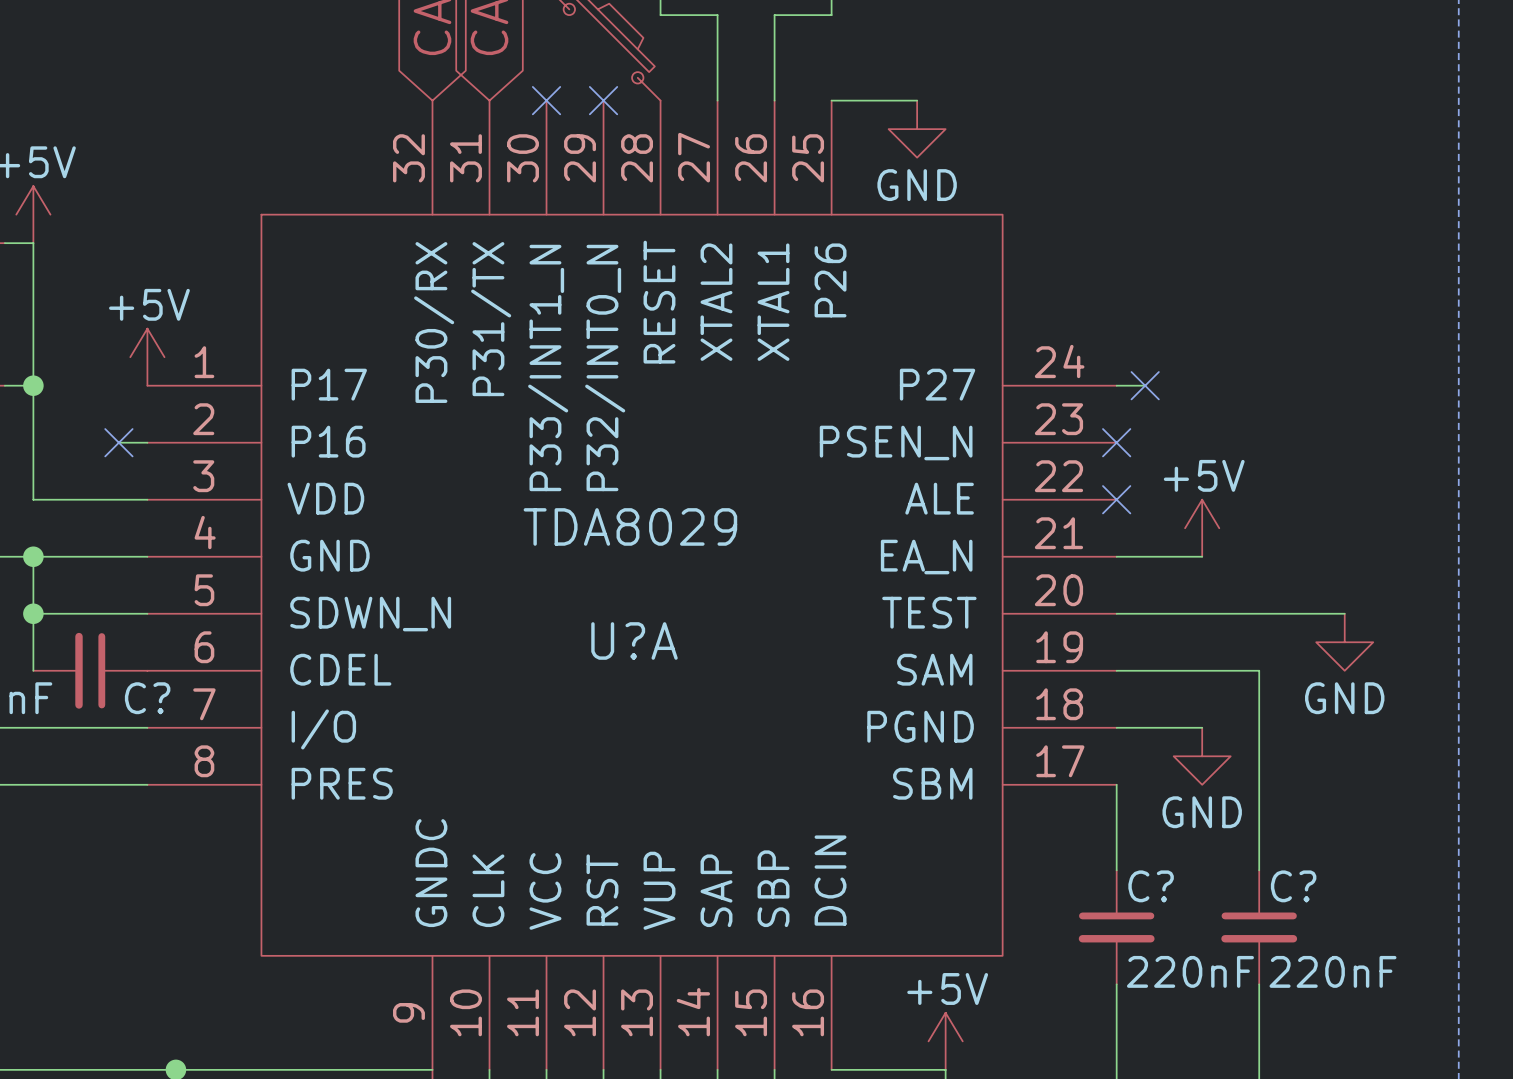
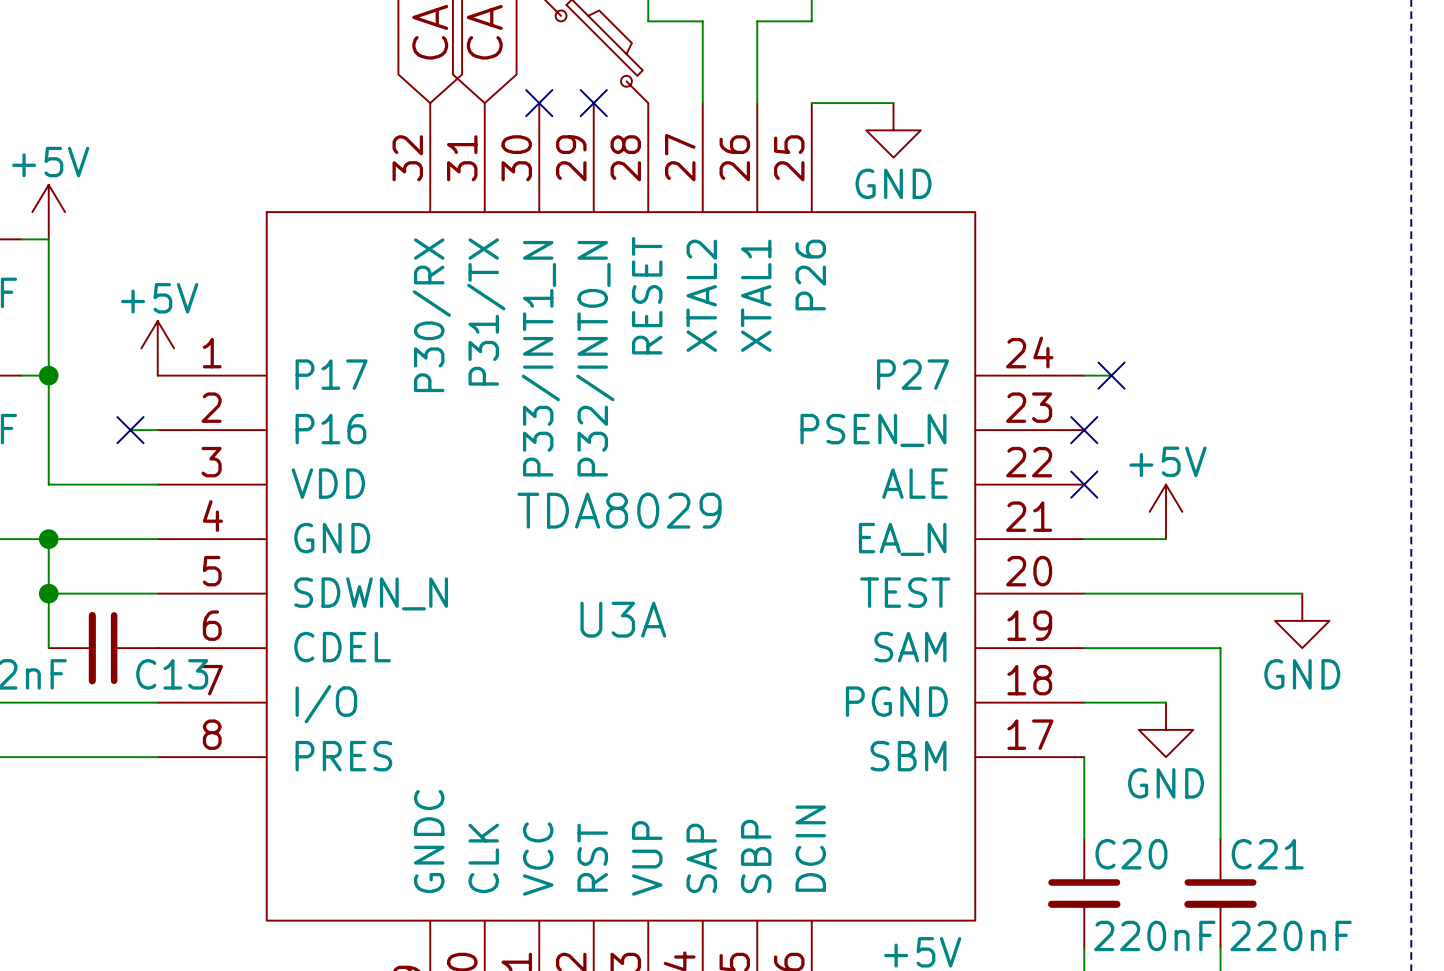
U?A name: U?A (634, 640) -> U3A (623, 619)
C? name: C? (147, 698) -> C13 (172, 674)
C? name: C? (1151, 886) -> C20 (1131, 854)
C? name: C? (1293, 886) -> C21 (1267, 854)

